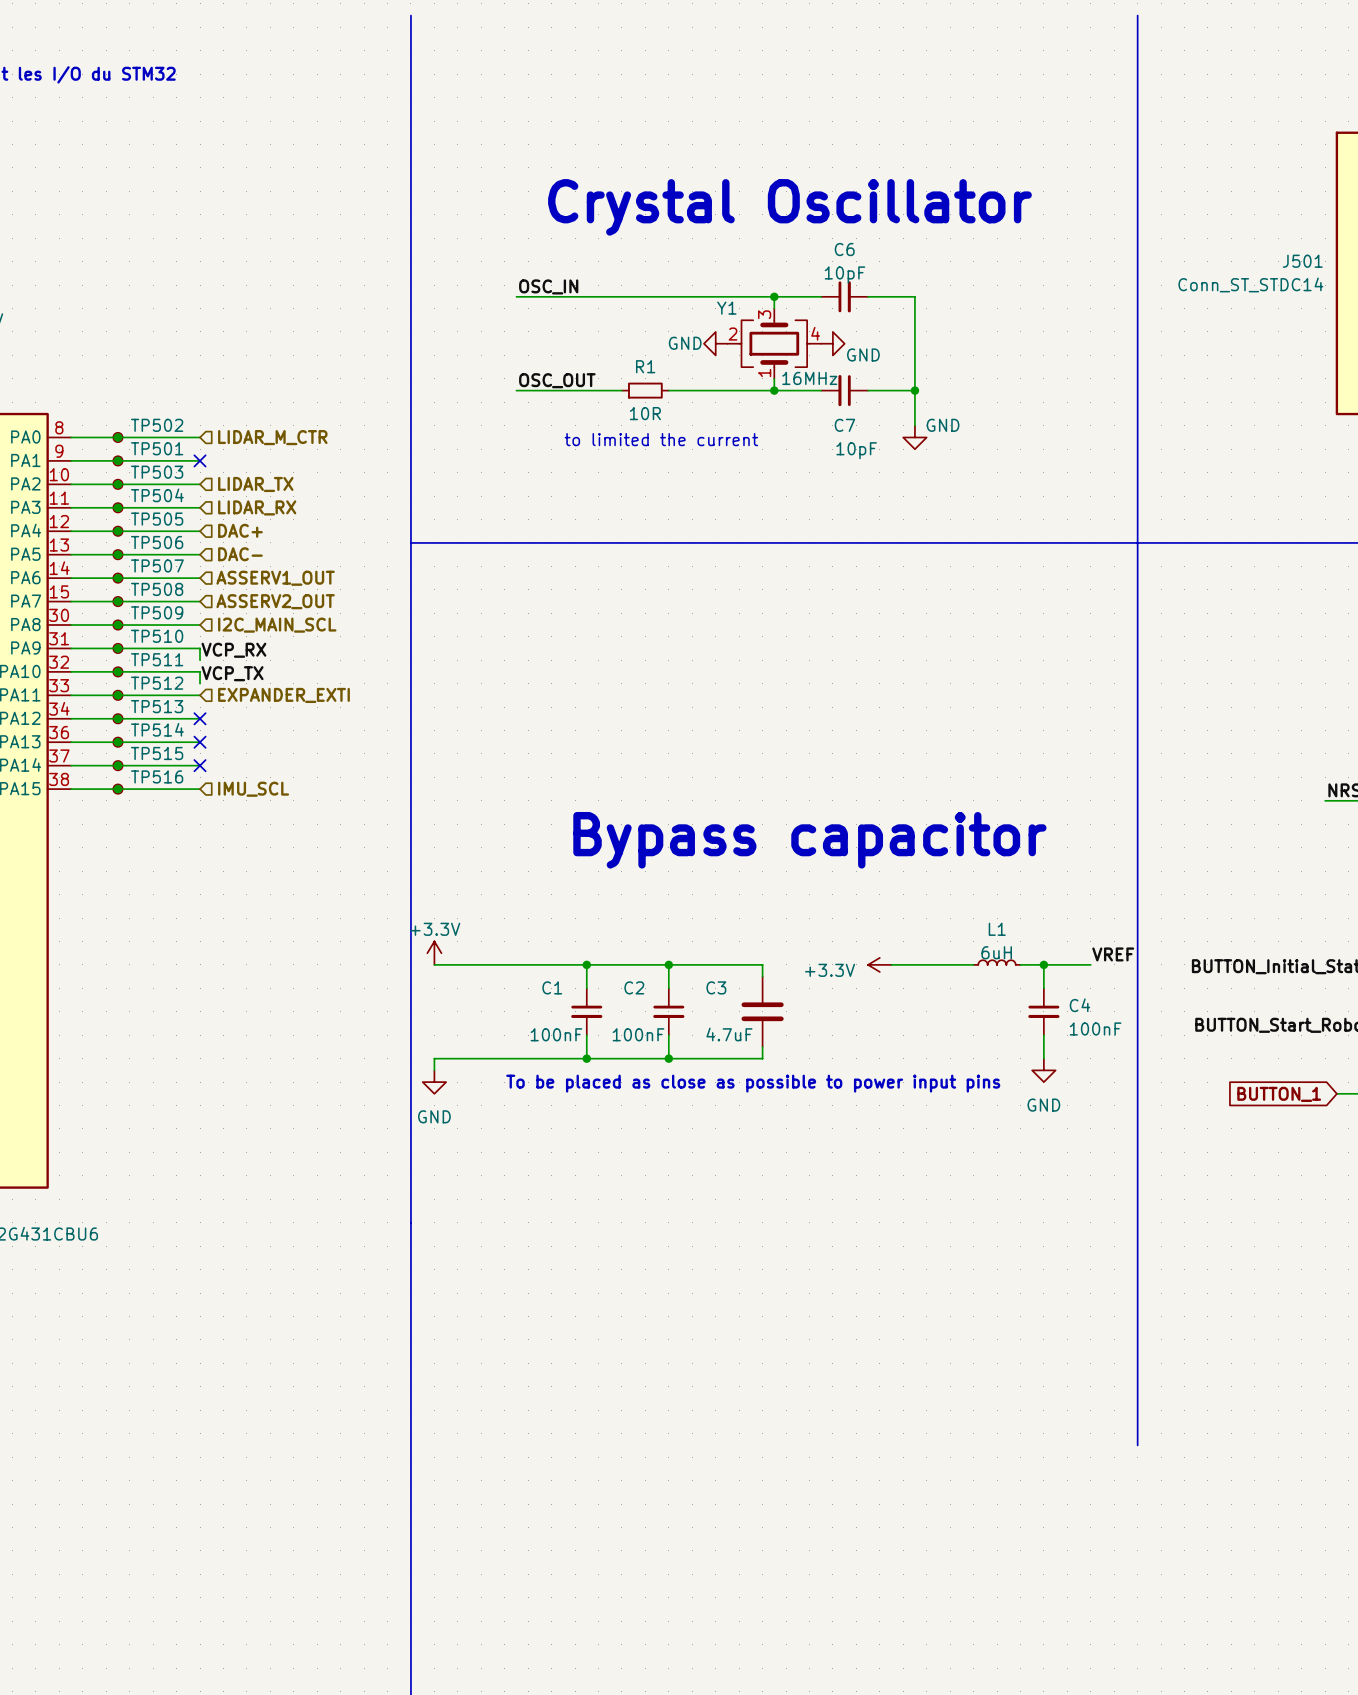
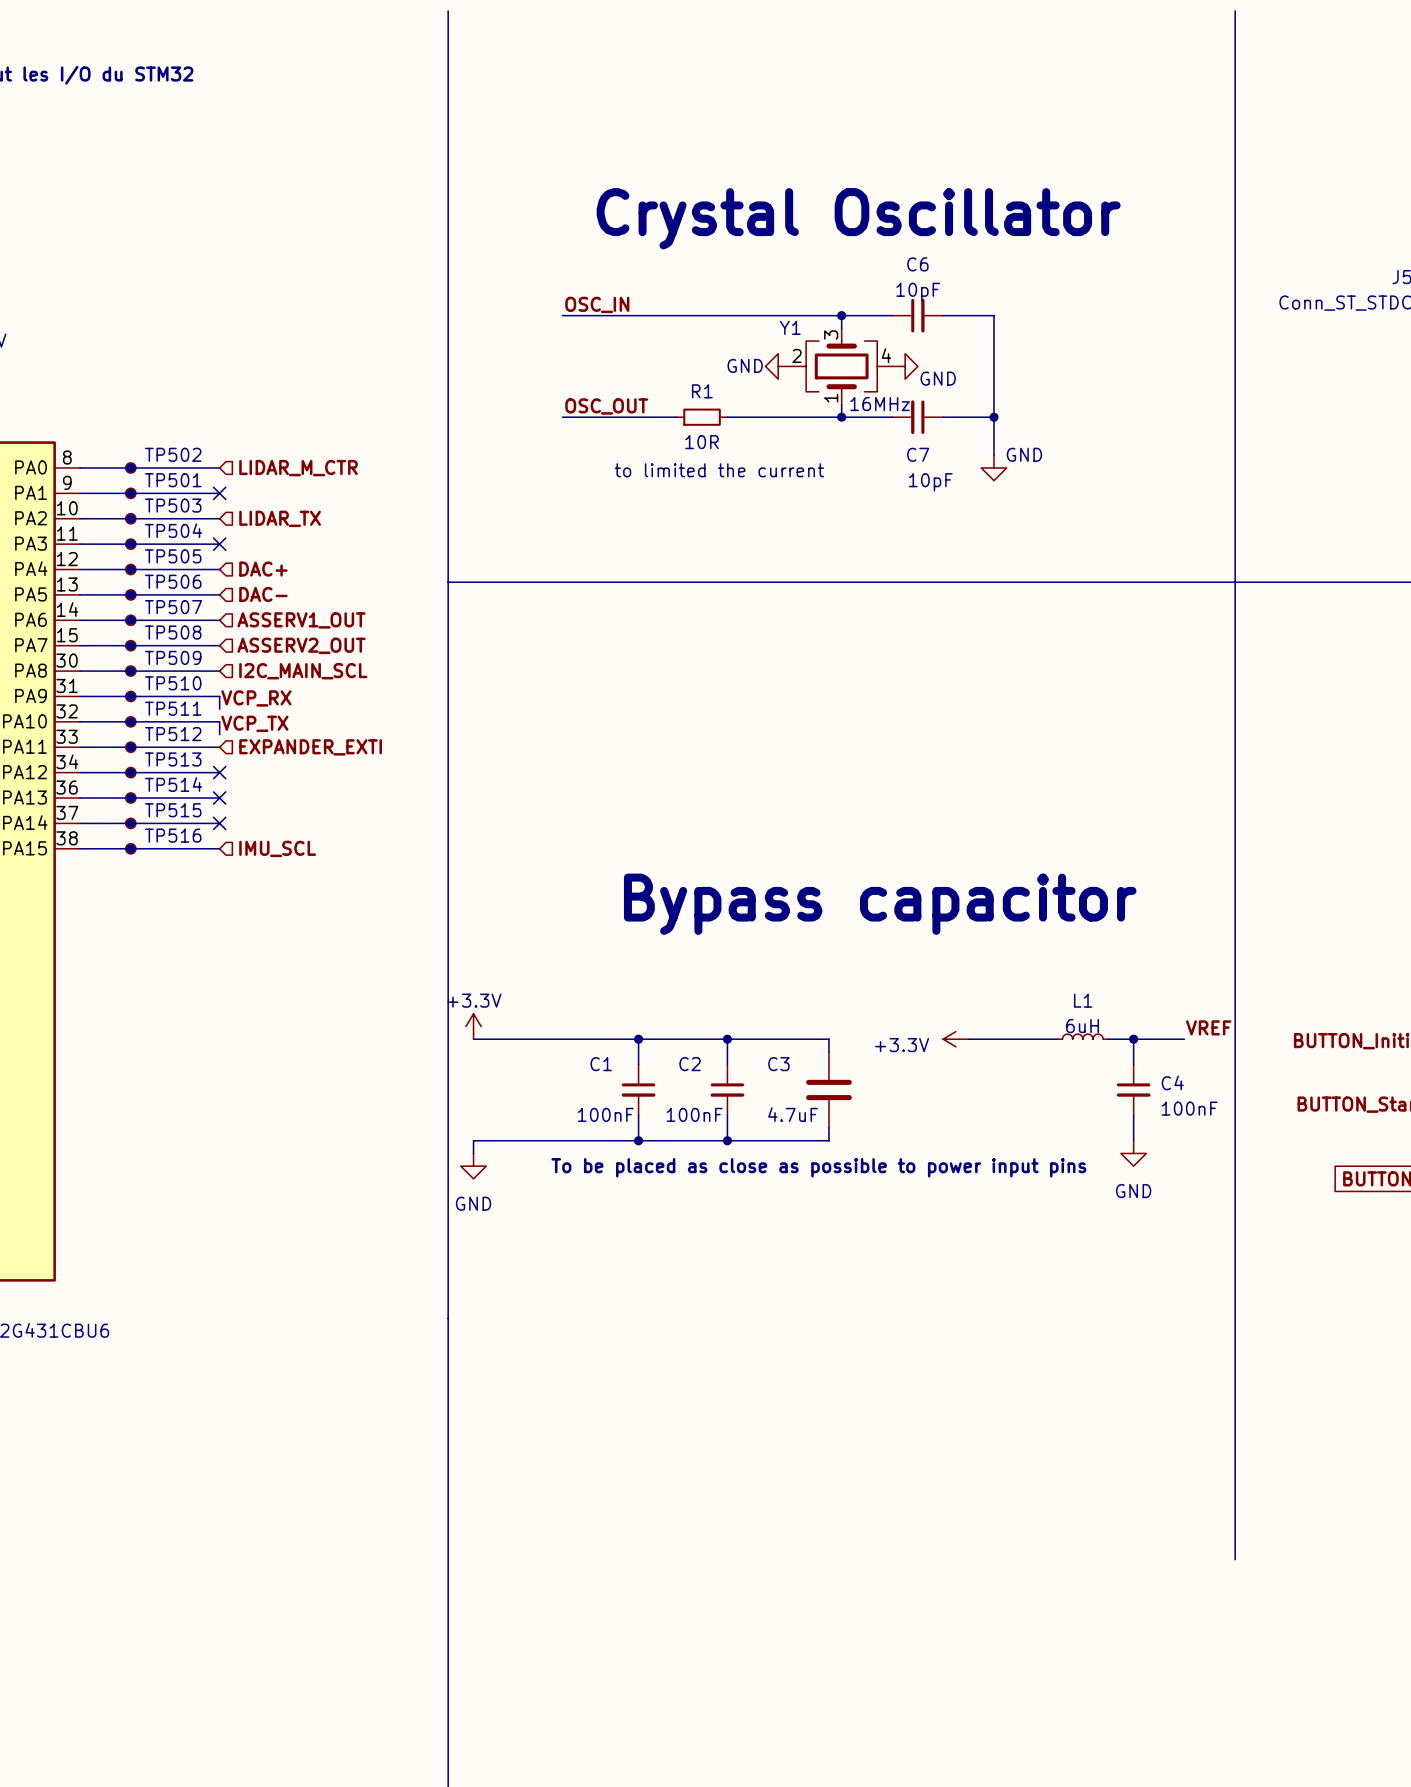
no-connect mark: none -> (219, 544)
hierarchical label: LIDAR_RX (257, 507) -> none

